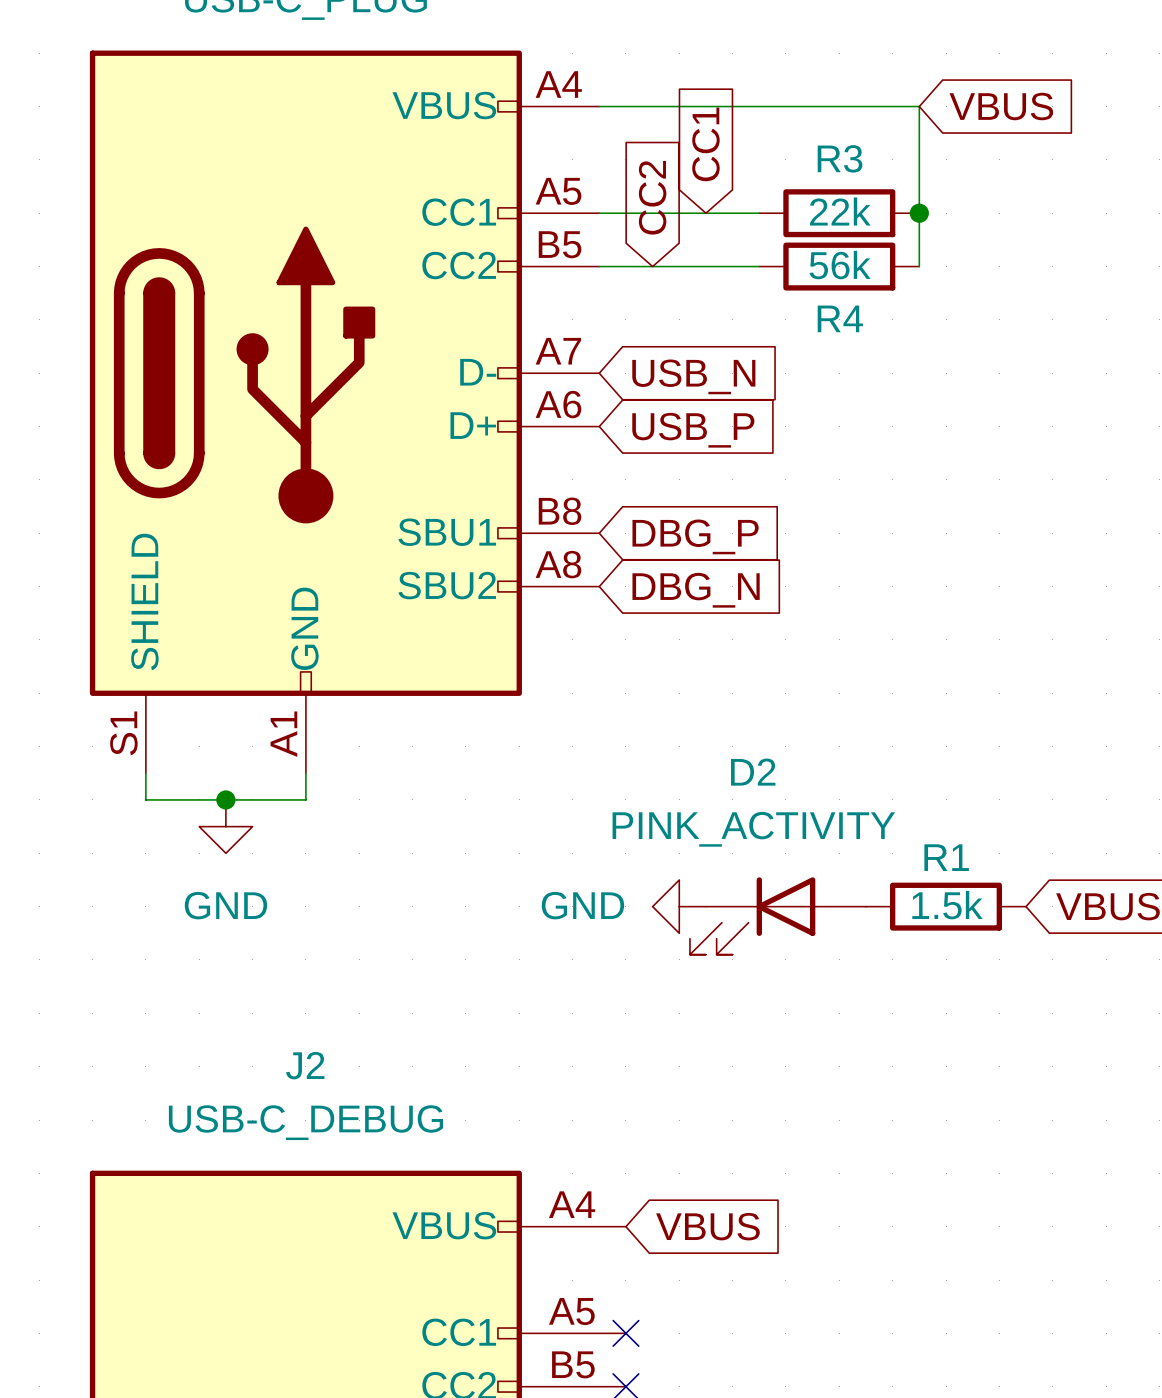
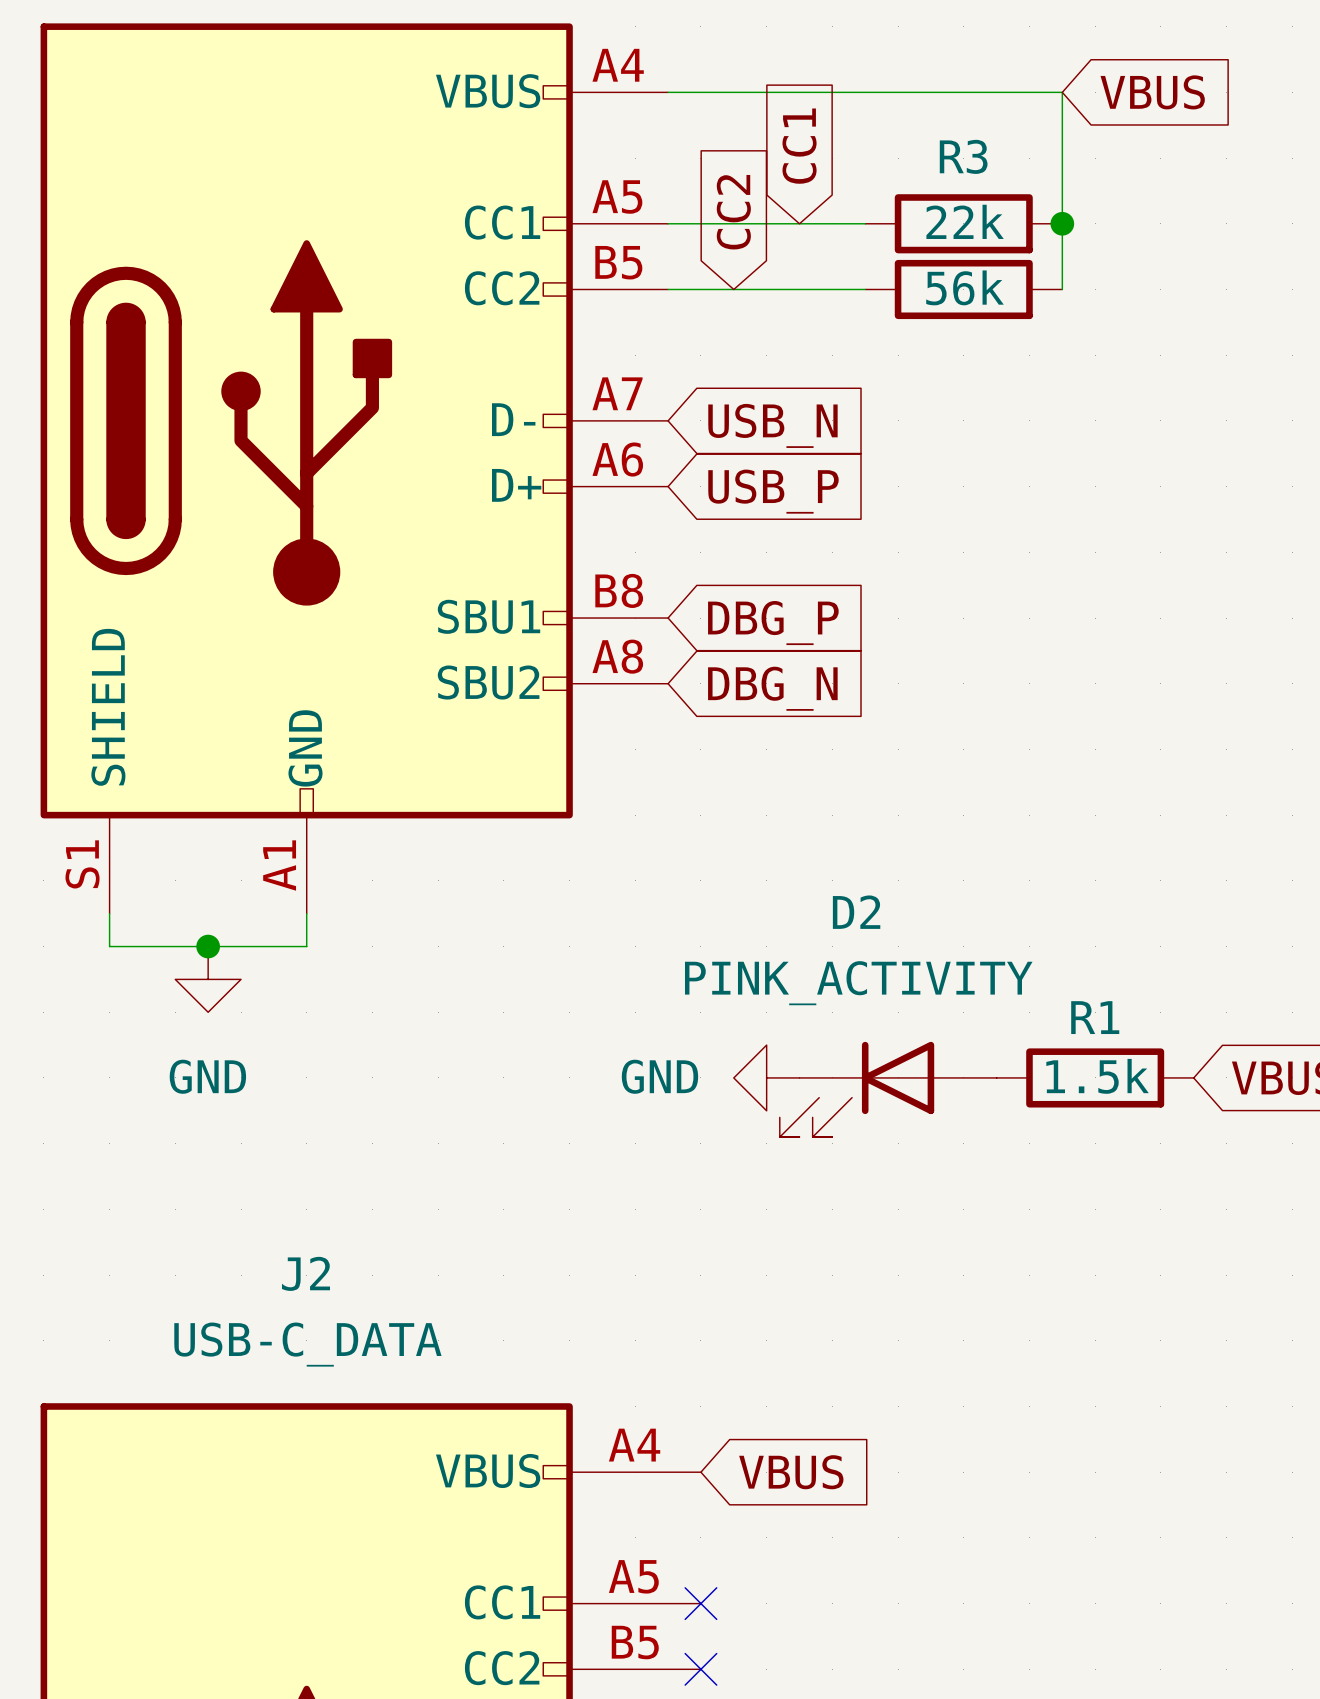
R4 name: R4 (840, 318) -> none
J2 value: USB-C_DEBUG (305, 1122) -> USB-C_DATA (307, 1344)

